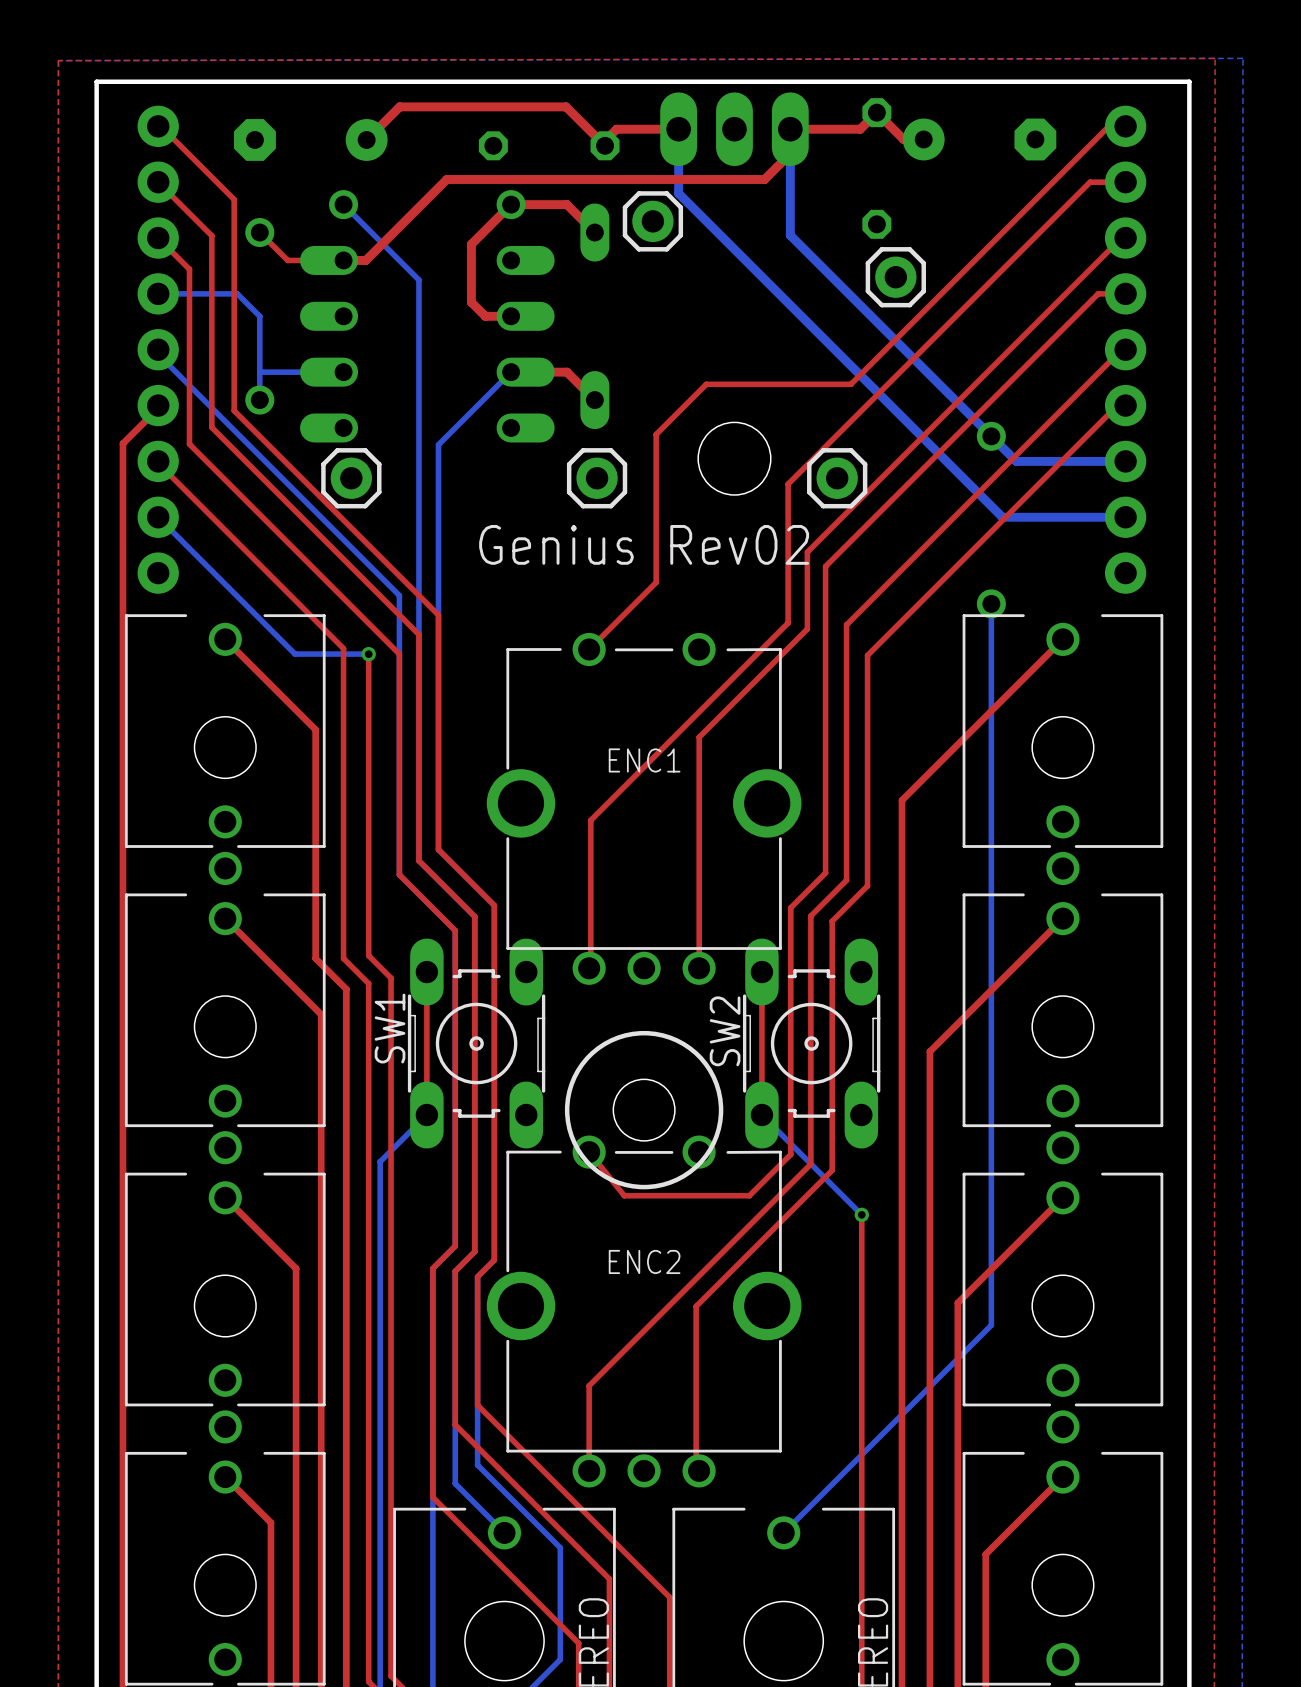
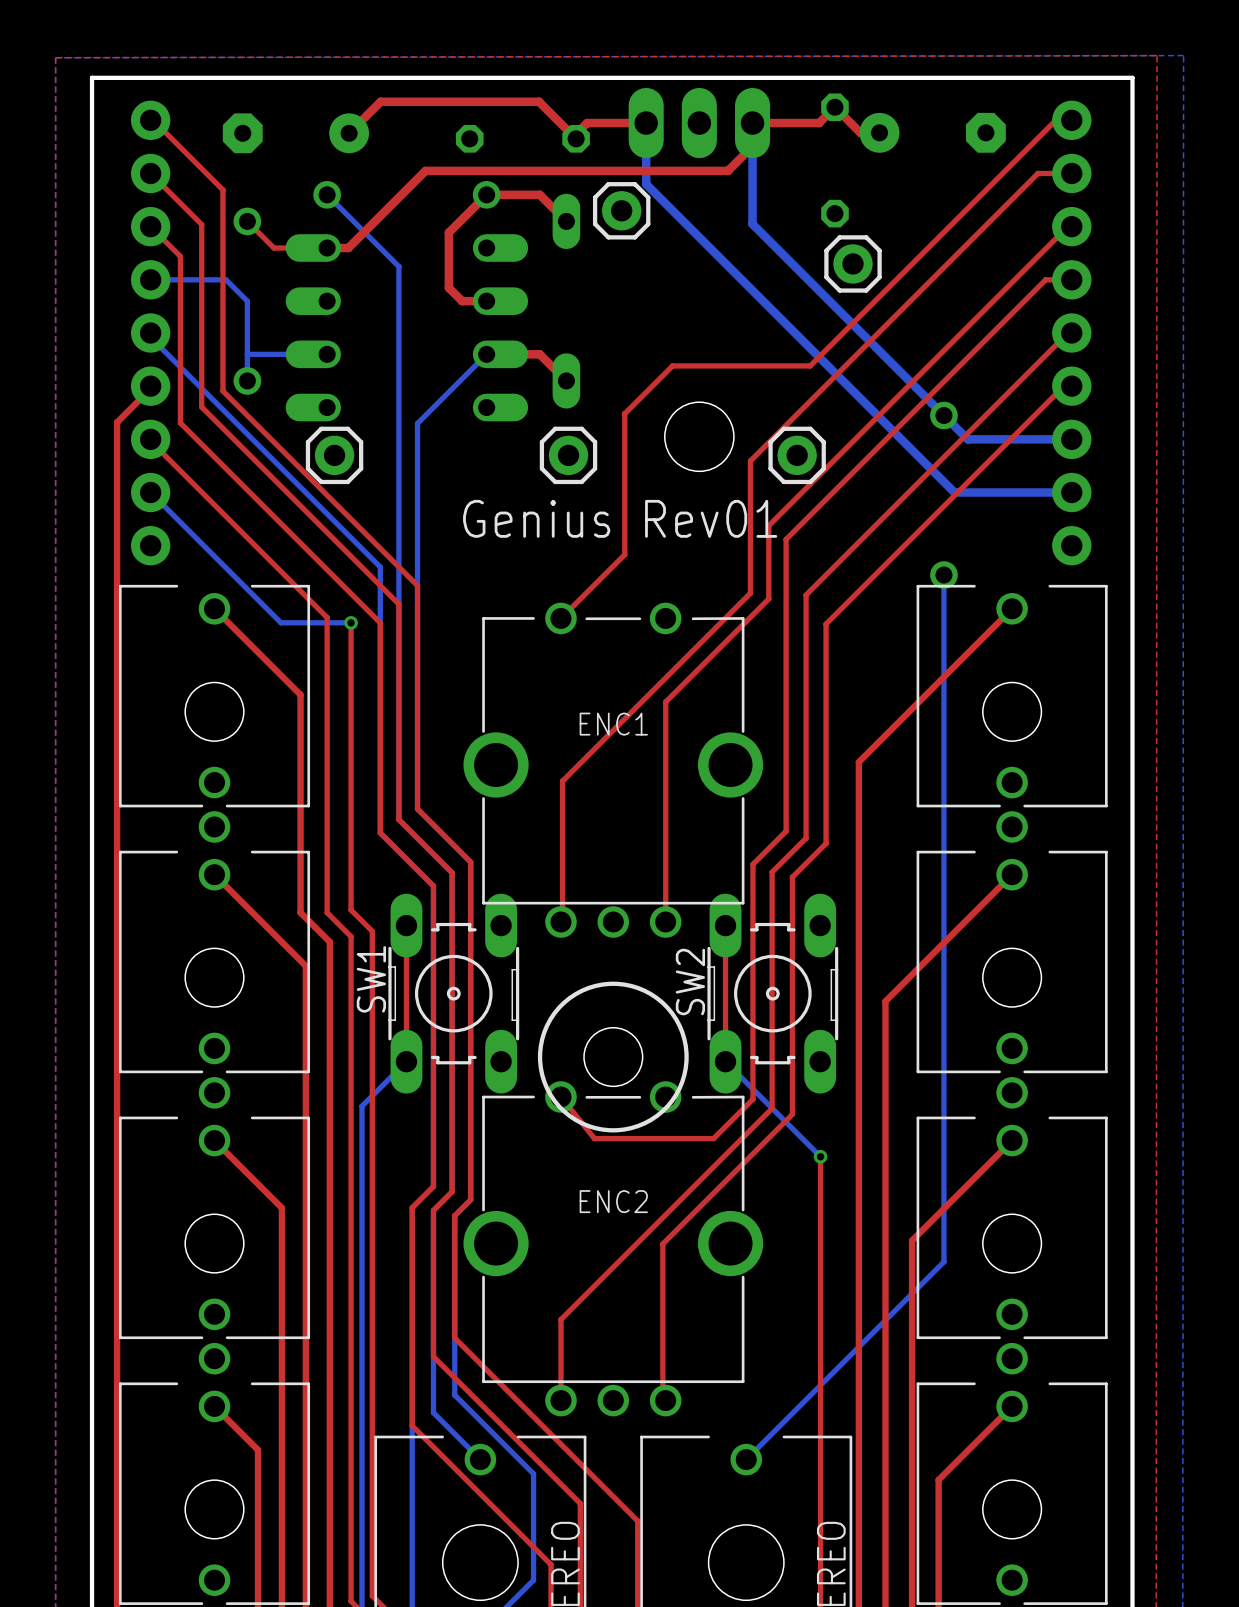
text: Genius Rev02 (644, 544) -> Genius Rev01 (620, 518)

